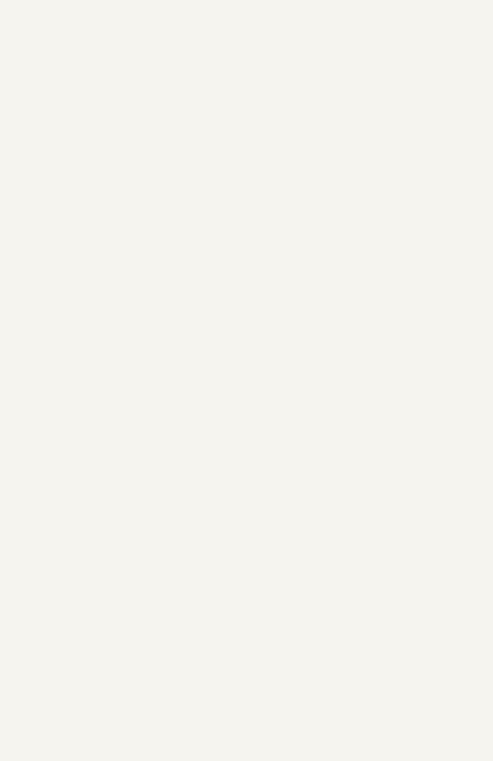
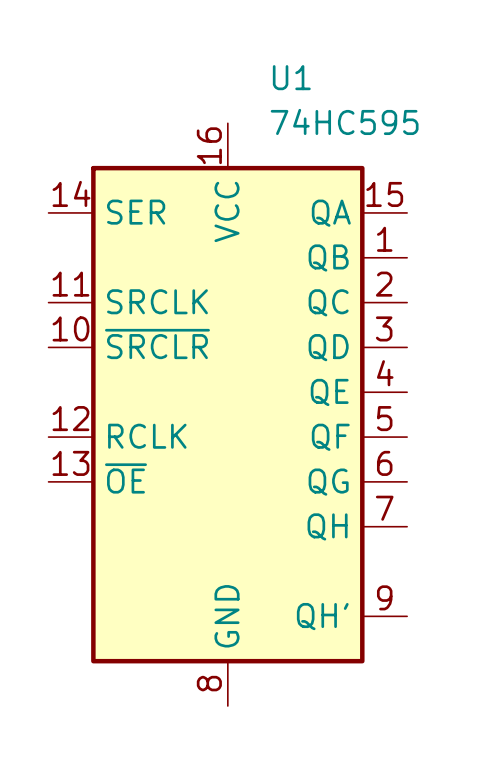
U1: none -> 74HC595 (227, 414)

